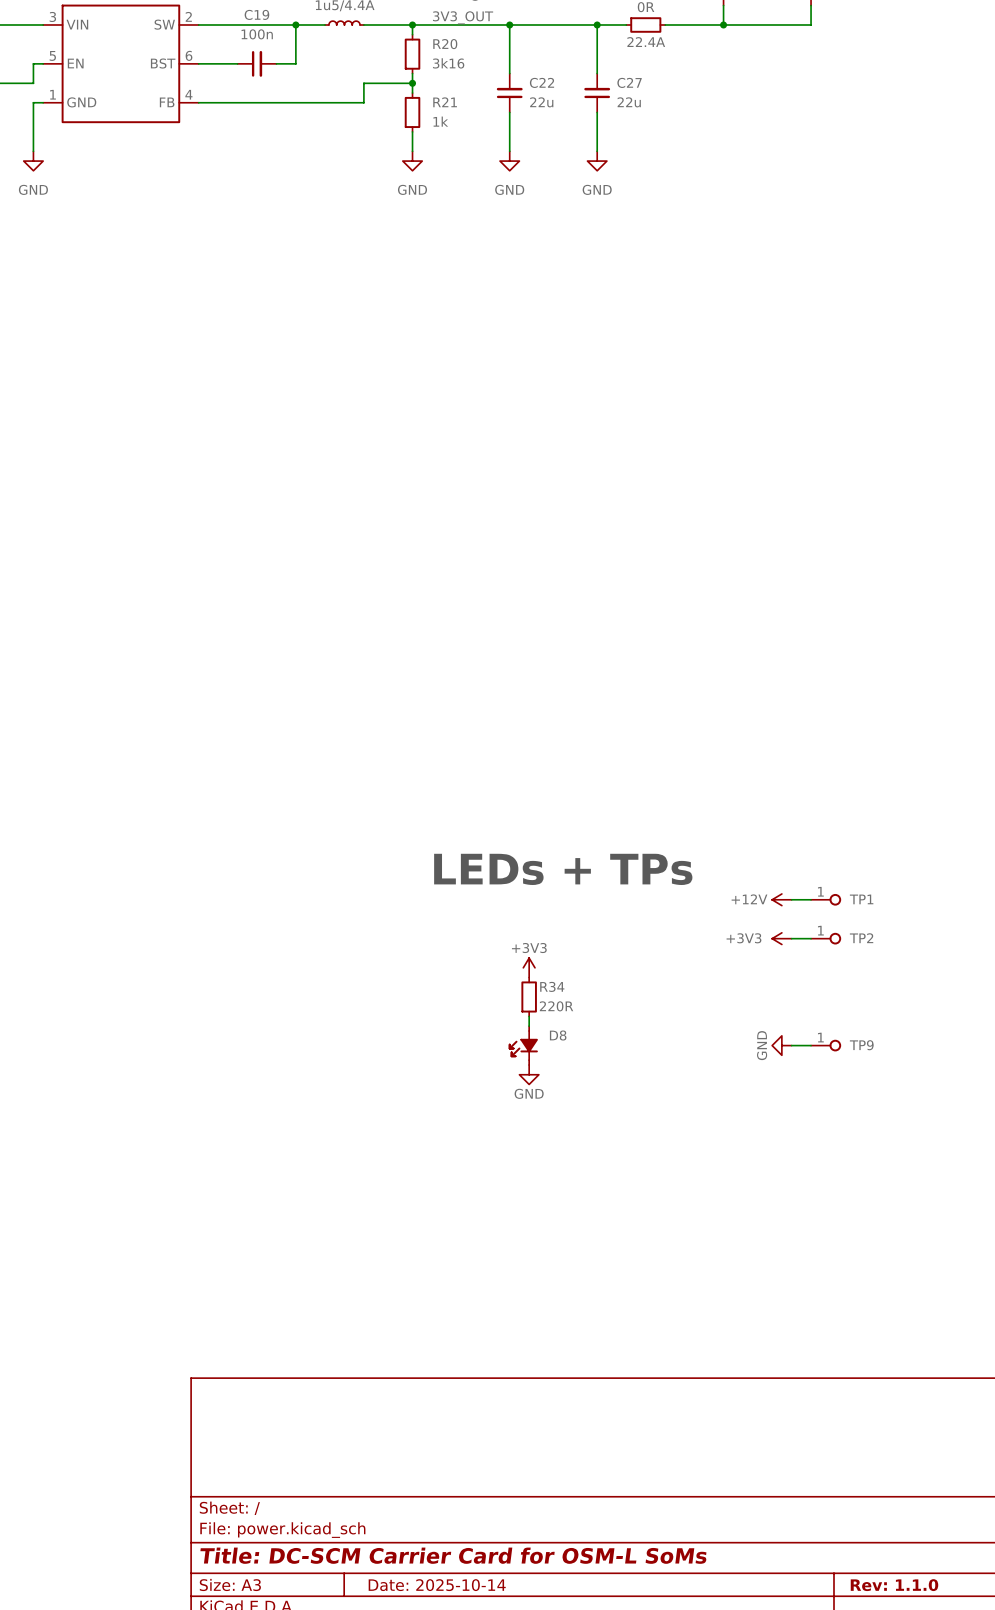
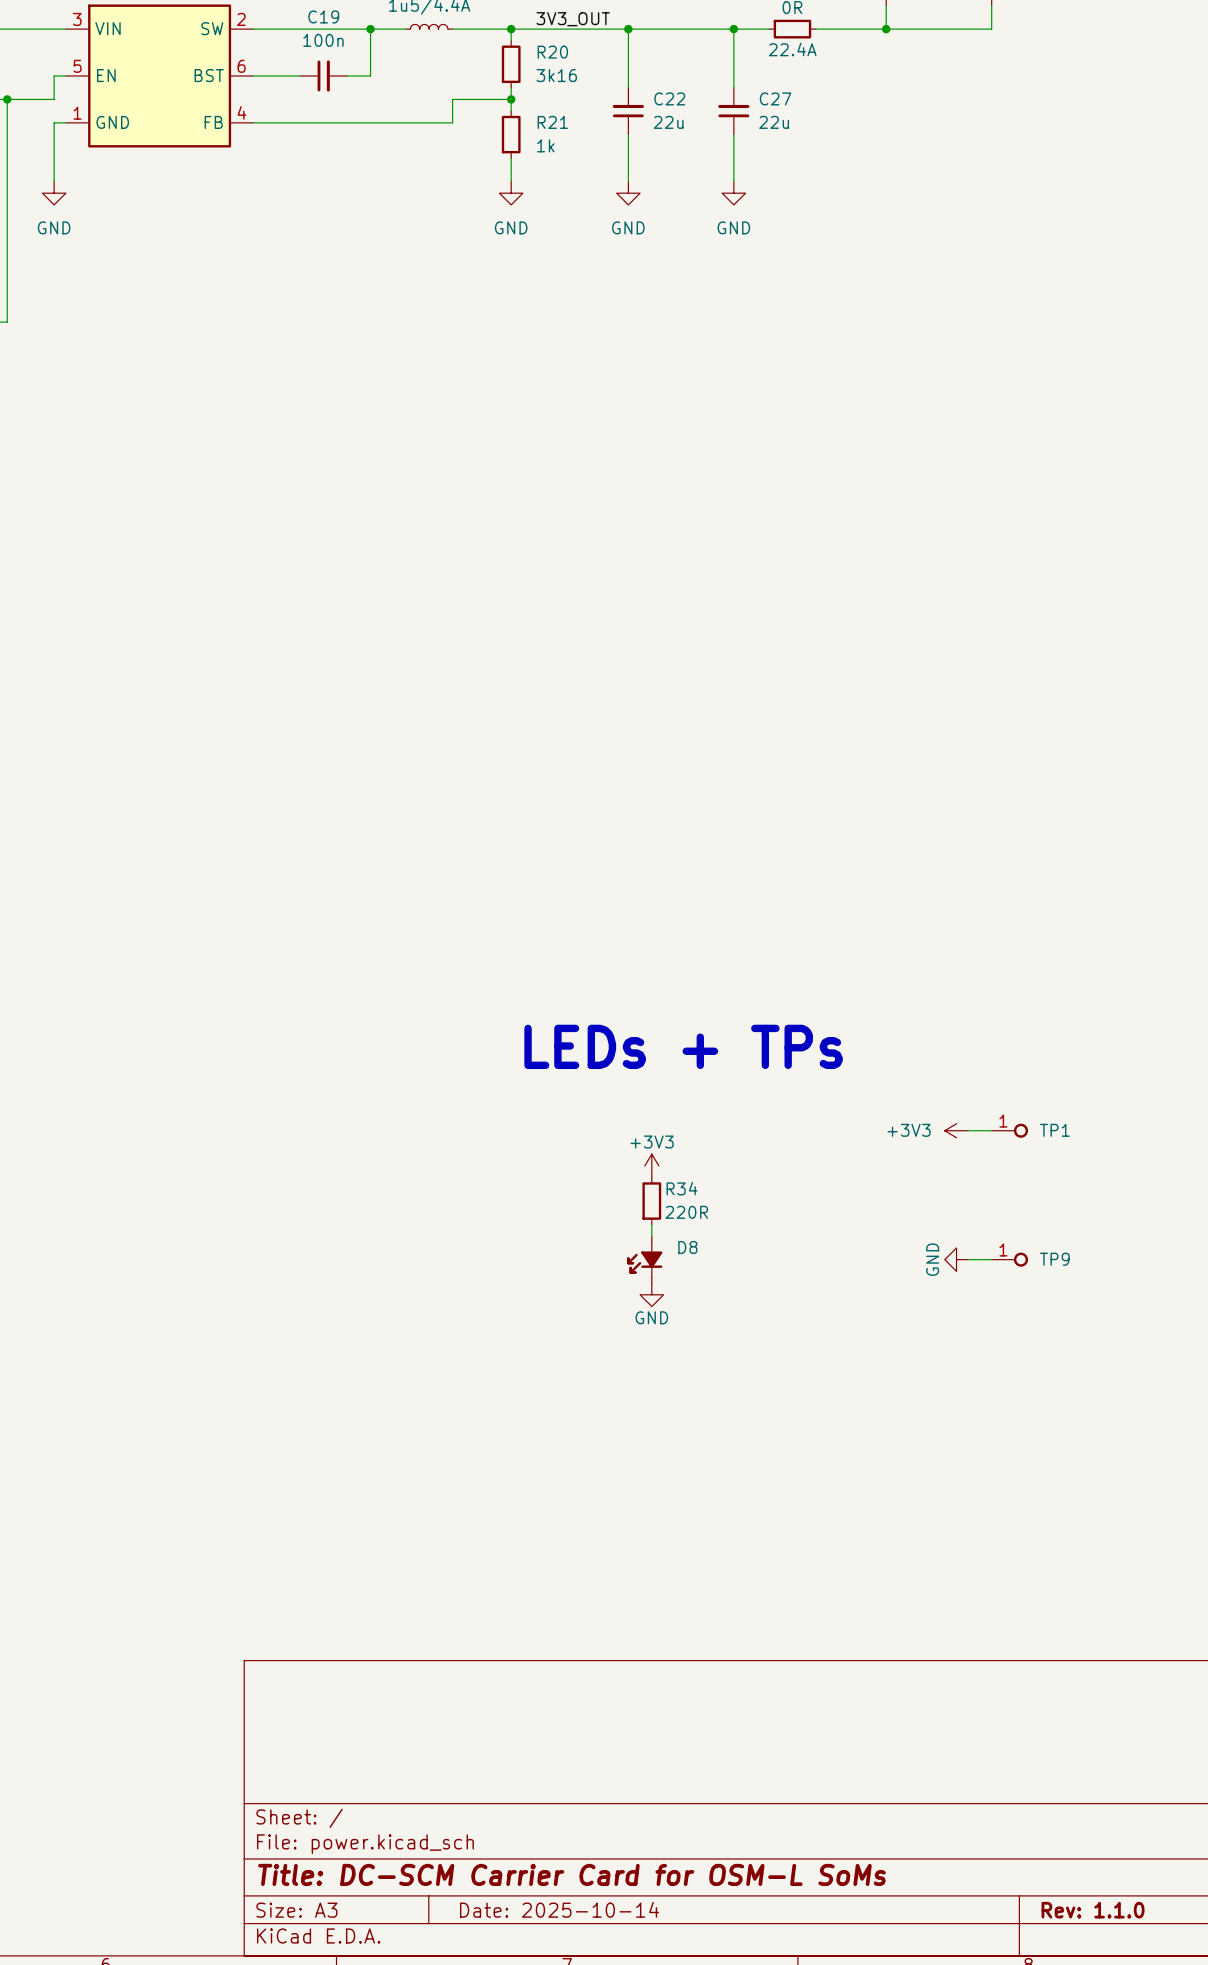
power symbol: +12V (781, 899) -> none
wire: (791, 899) (811, 899) -> none
TP1: (826, 899) -> none
TP2 name: TP2 (861, 938) -> TP1 (1054, 1130)

